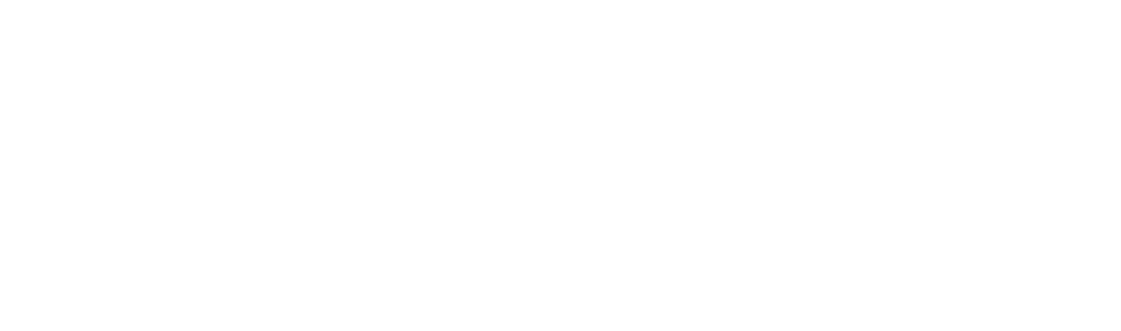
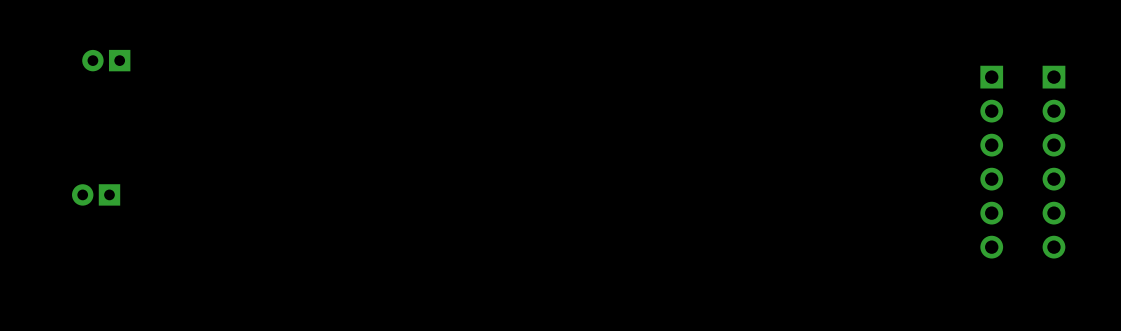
part: none -> (106, 60)
part: none -> (991, 162)
part: none -> (1053, 162)
part: none -> (96, 194)

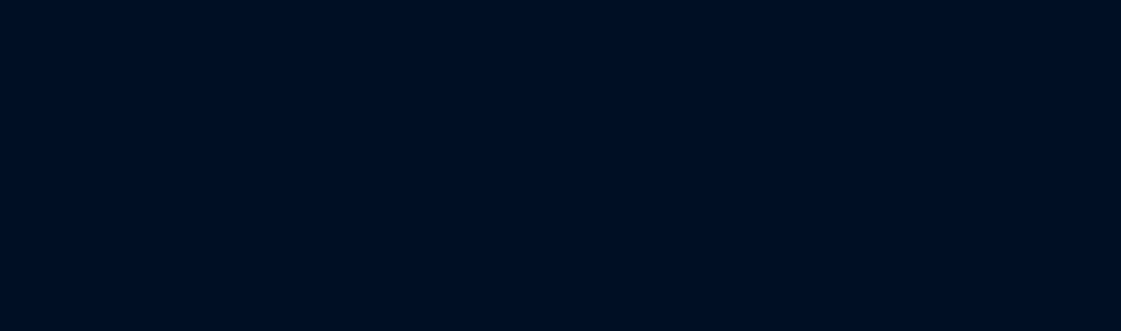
part: (106, 60) -> none
part: (991, 162) -> none
part: (1053, 162) -> none
part: (96, 194) -> none

